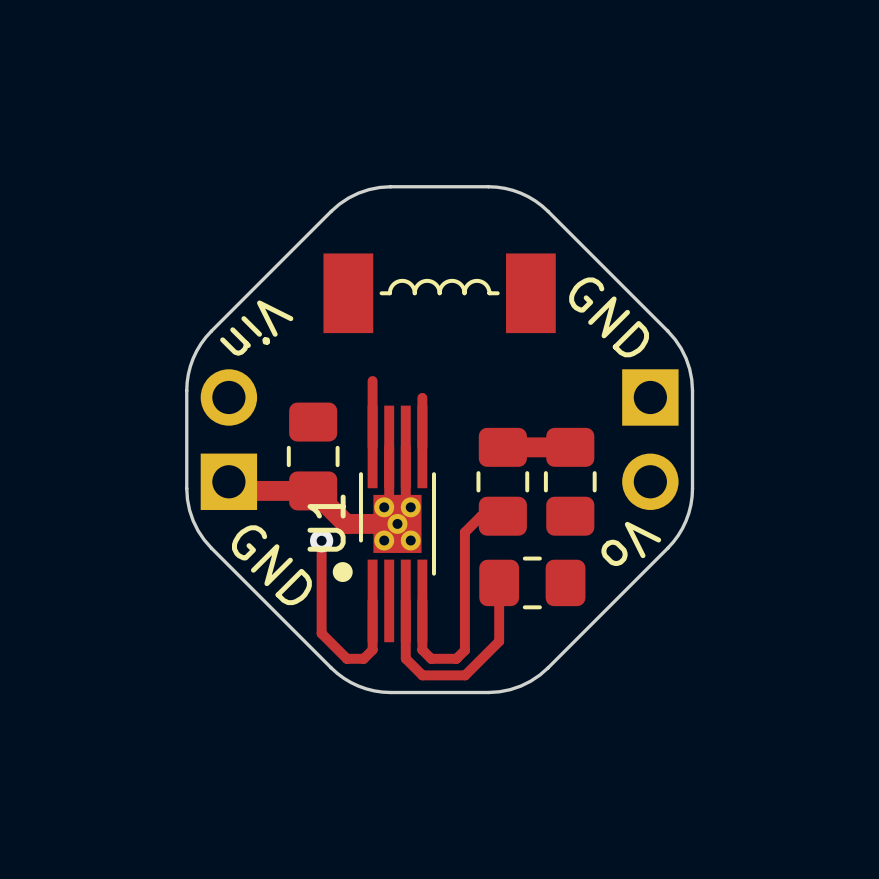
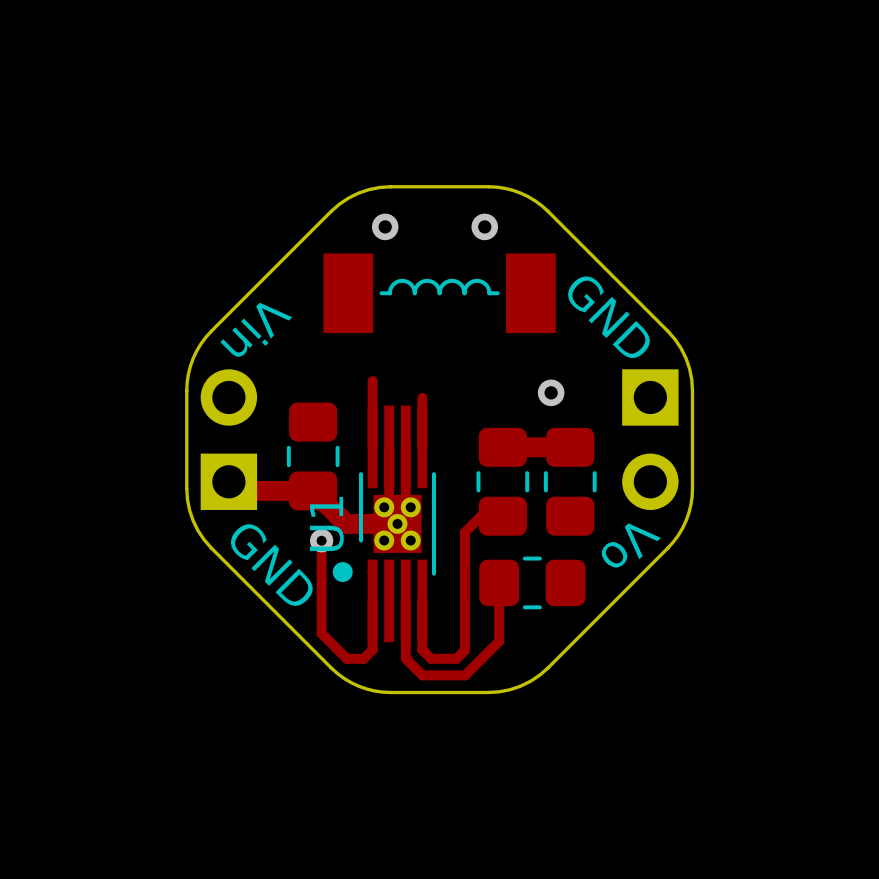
via: none -> (385, 226)
via: none -> (484, 226)
via: none -> (551, 392)

